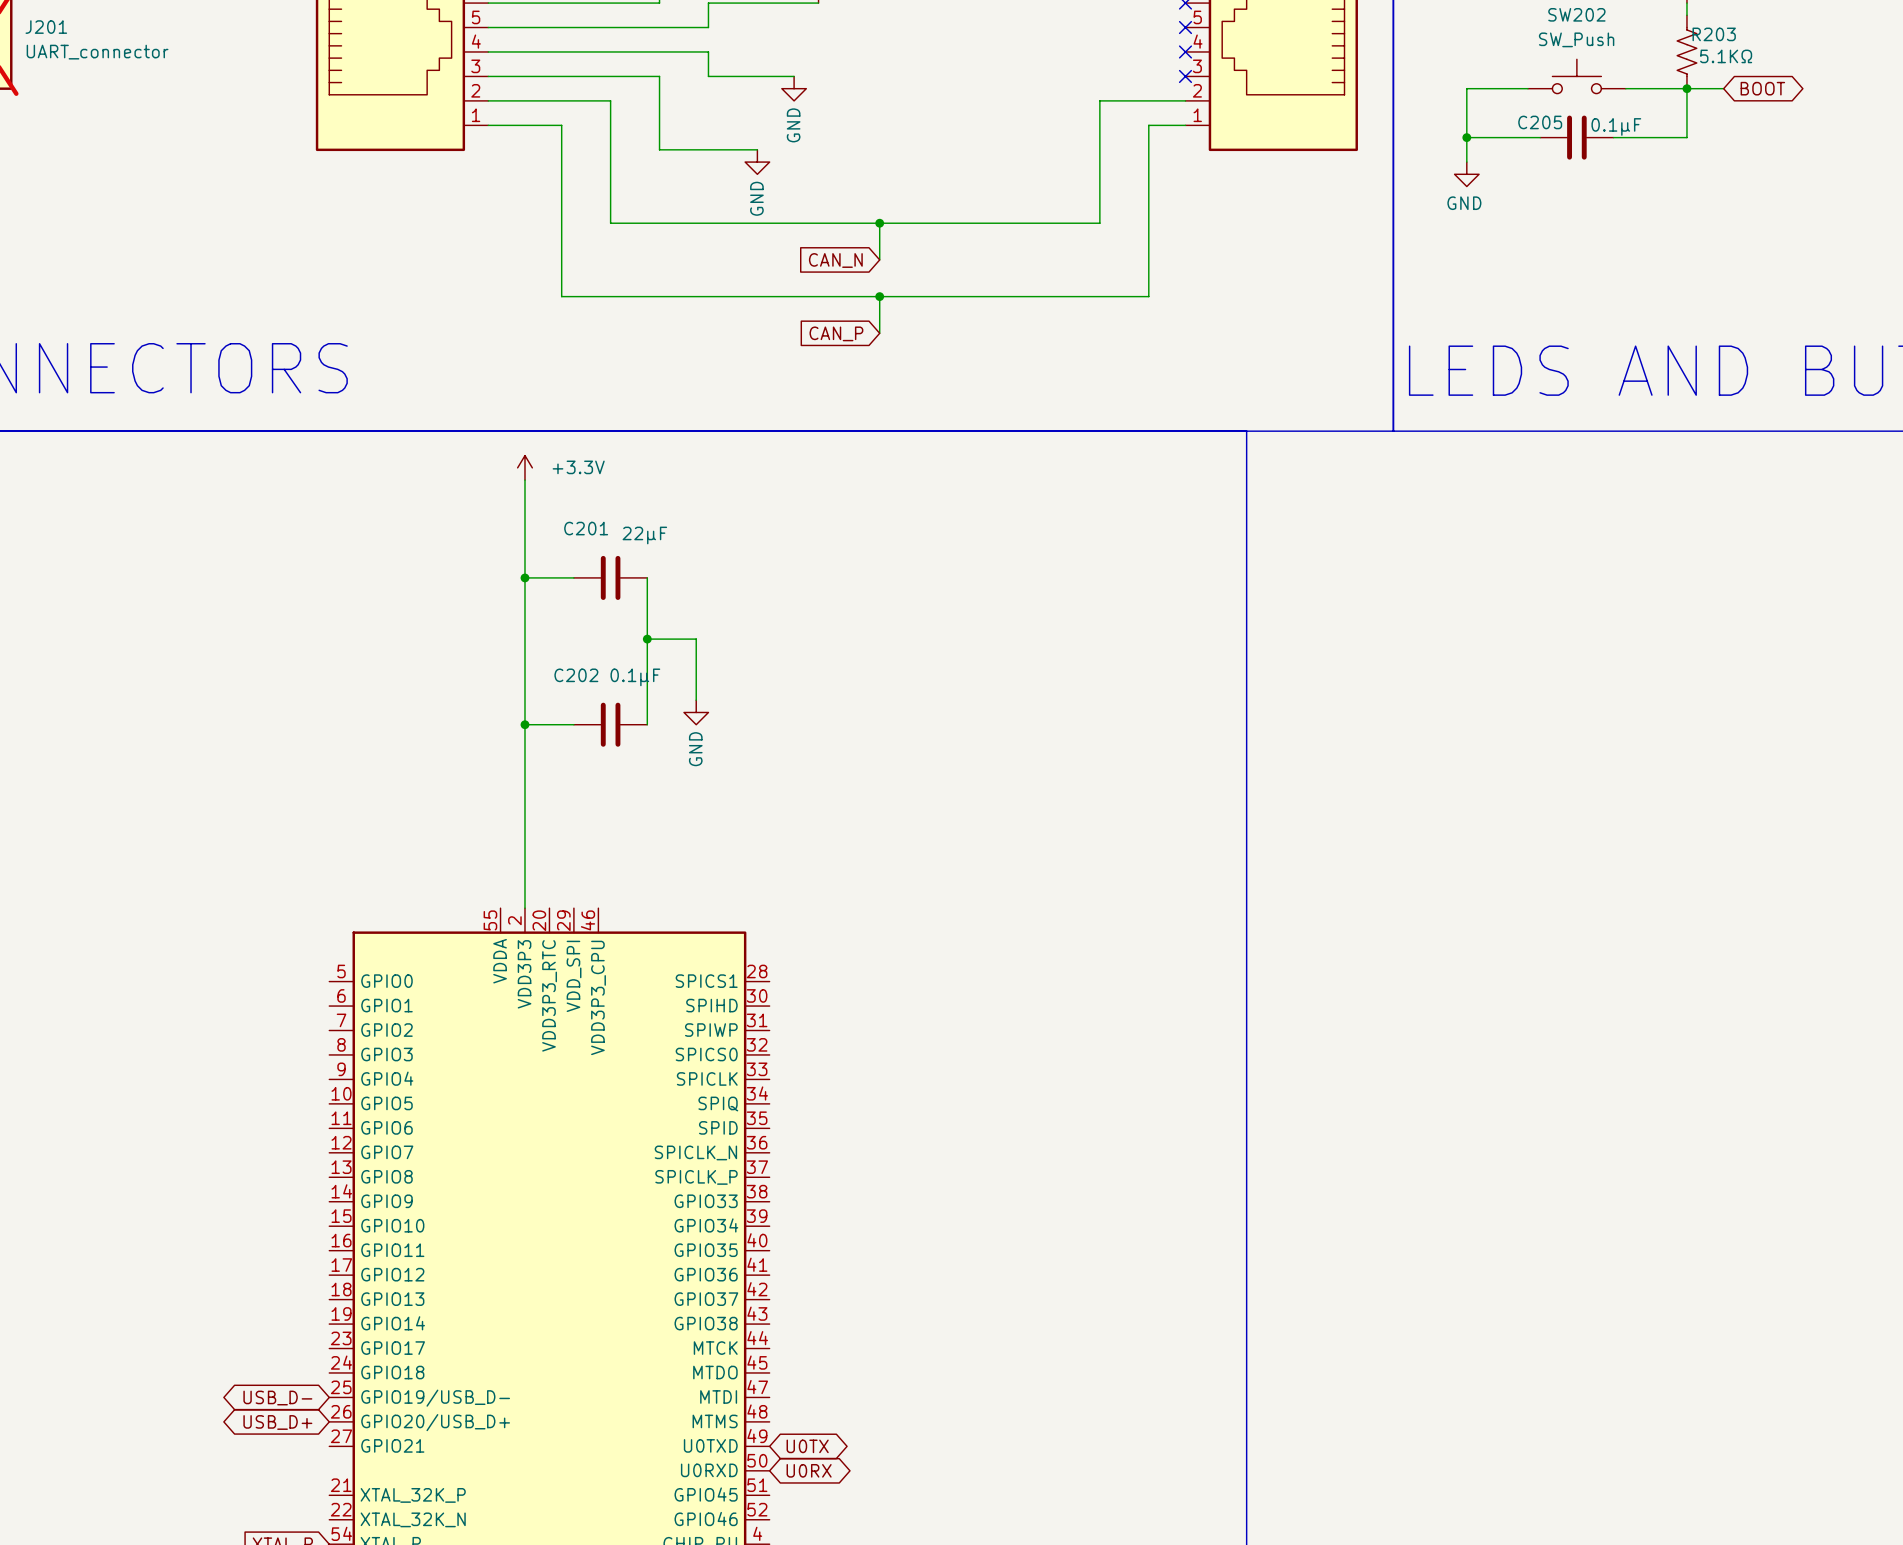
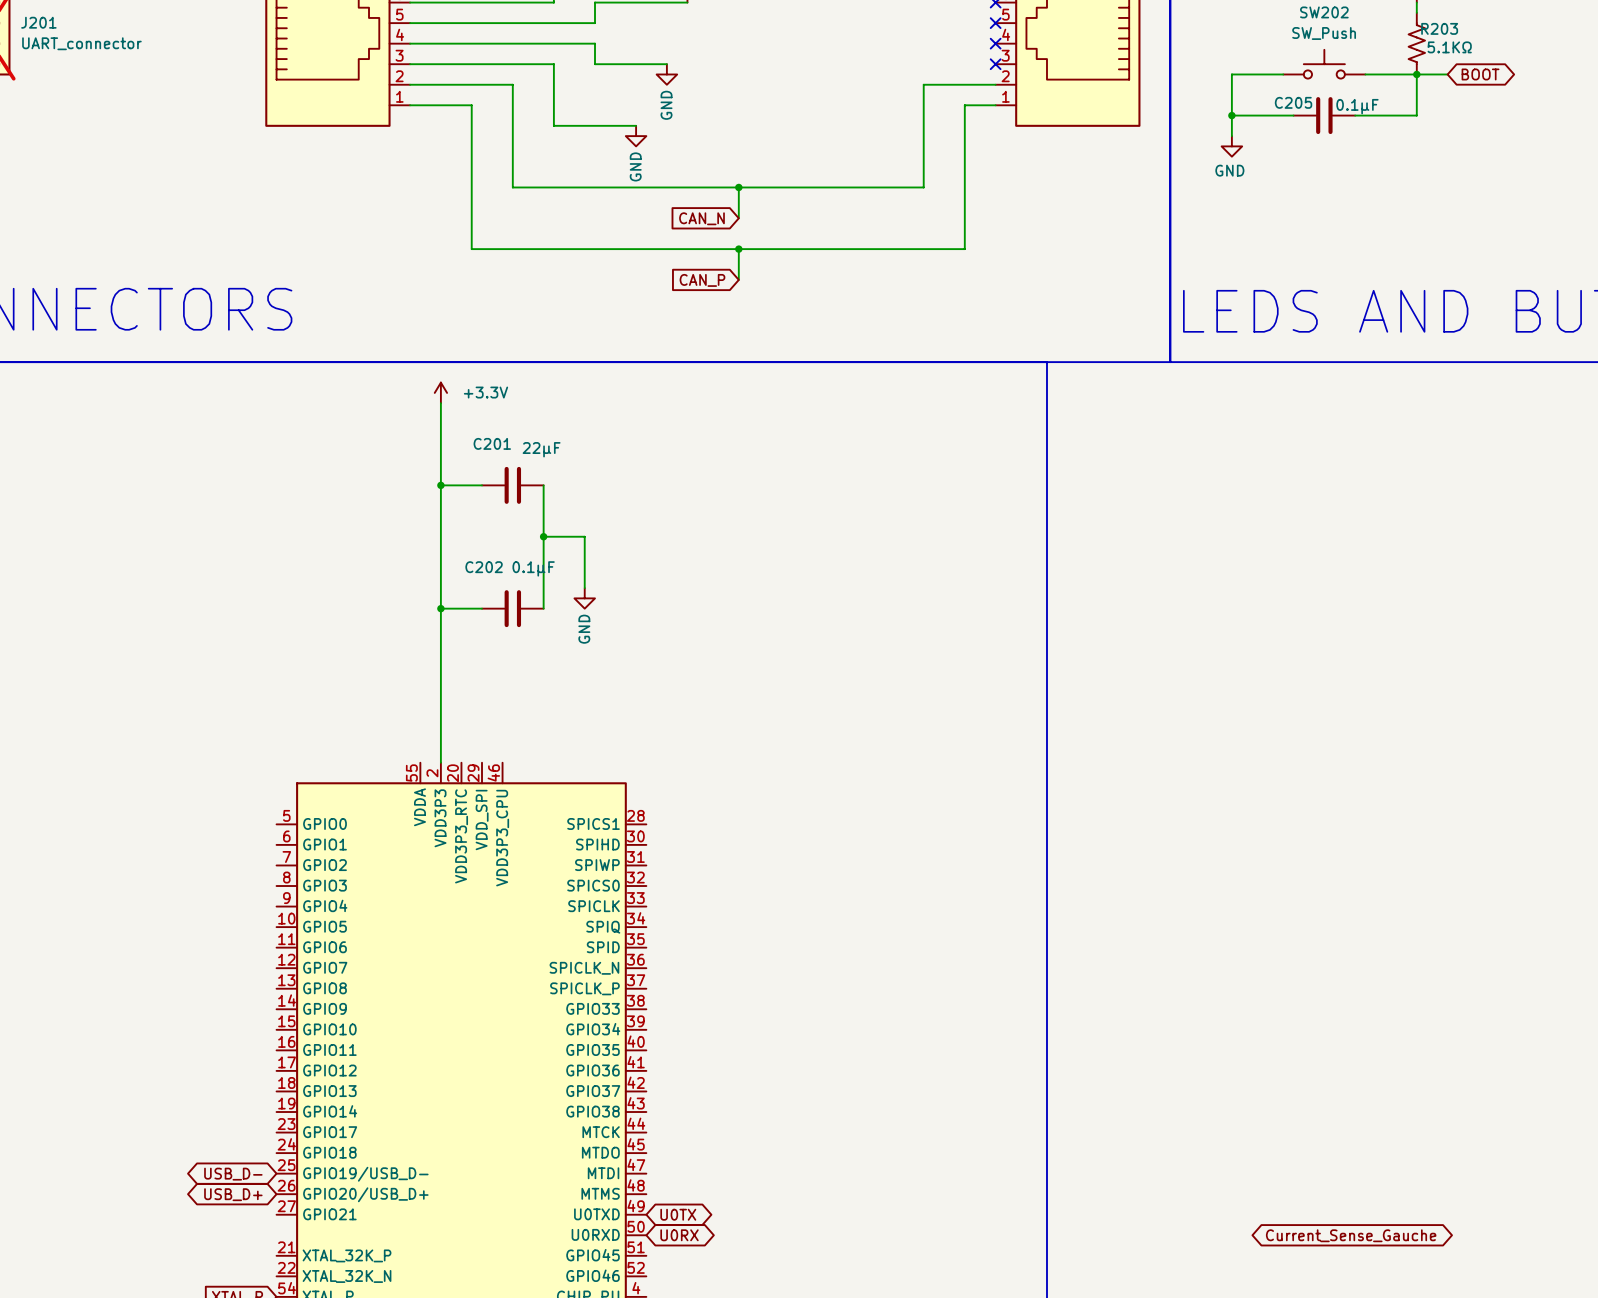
global label: none -> Current_Sense_Gauche (1351, 1235)

